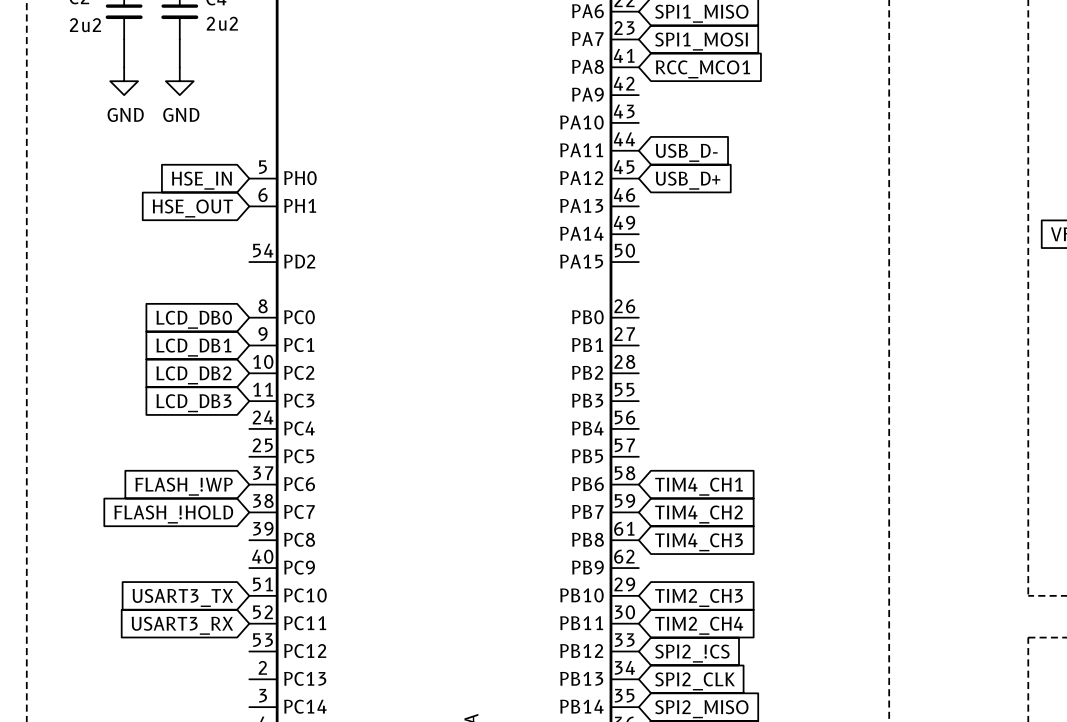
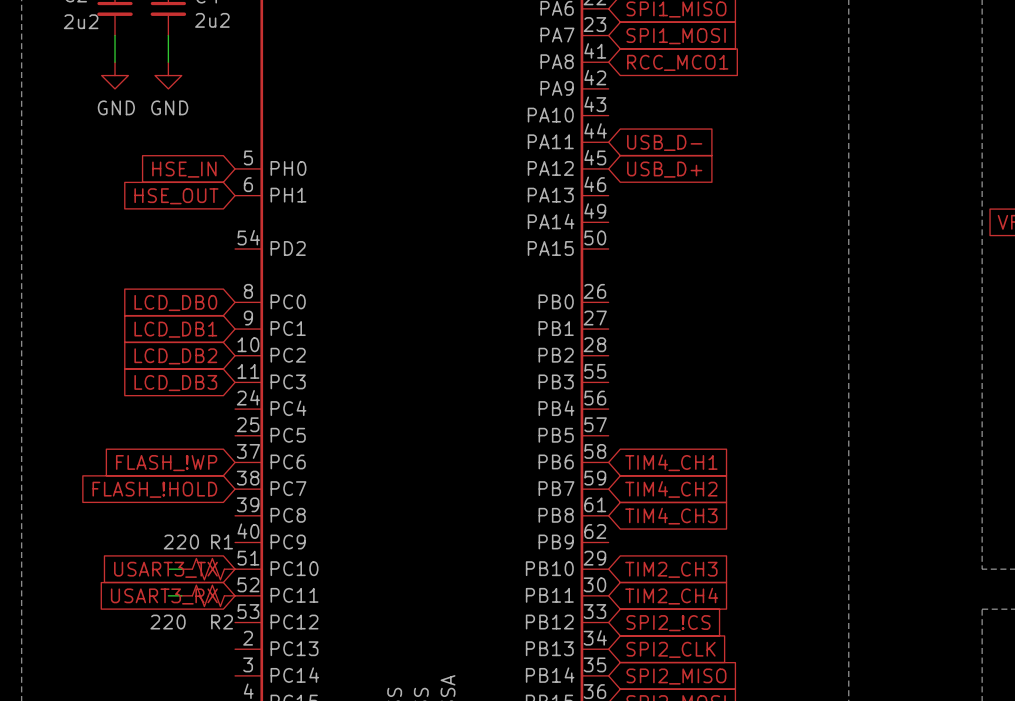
wire: none -> (168, 569) (181, 569)
R1: none -> 220 (208, 569)
wire: none -> (168, 595) (181, 595)
R2: none -> 220 (208, 595)

